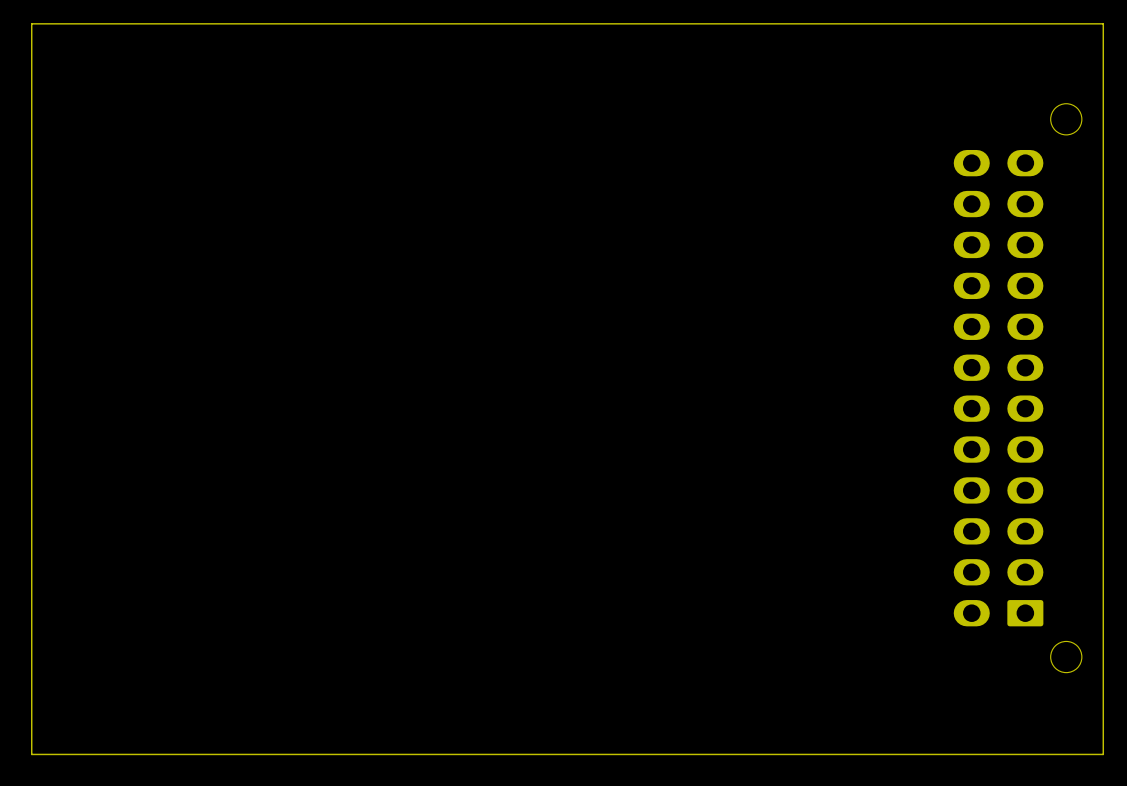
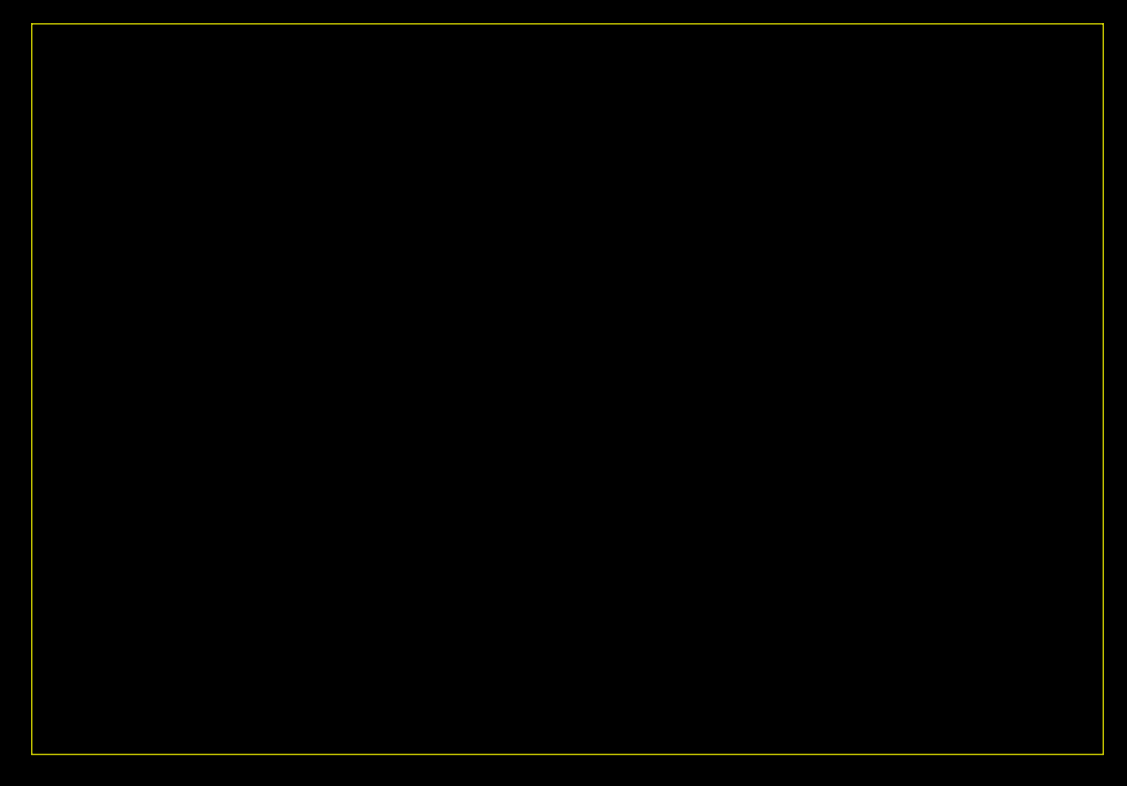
part: (1017, 388) -> none

